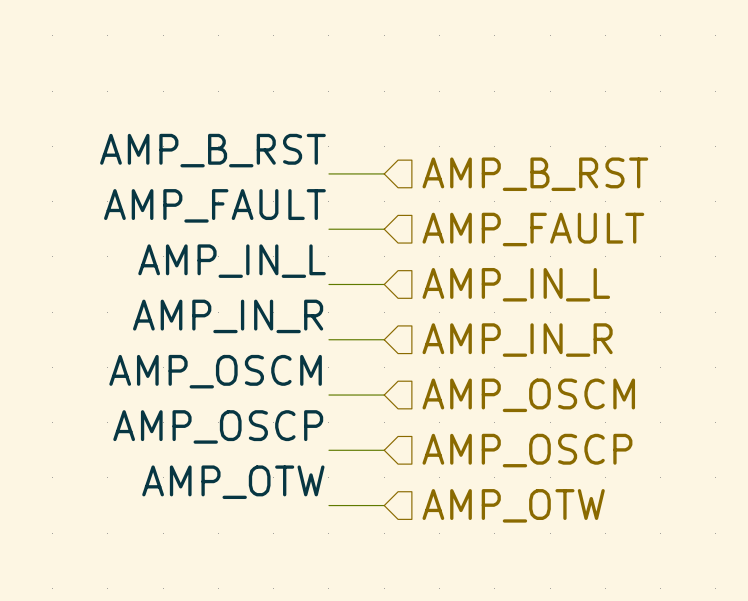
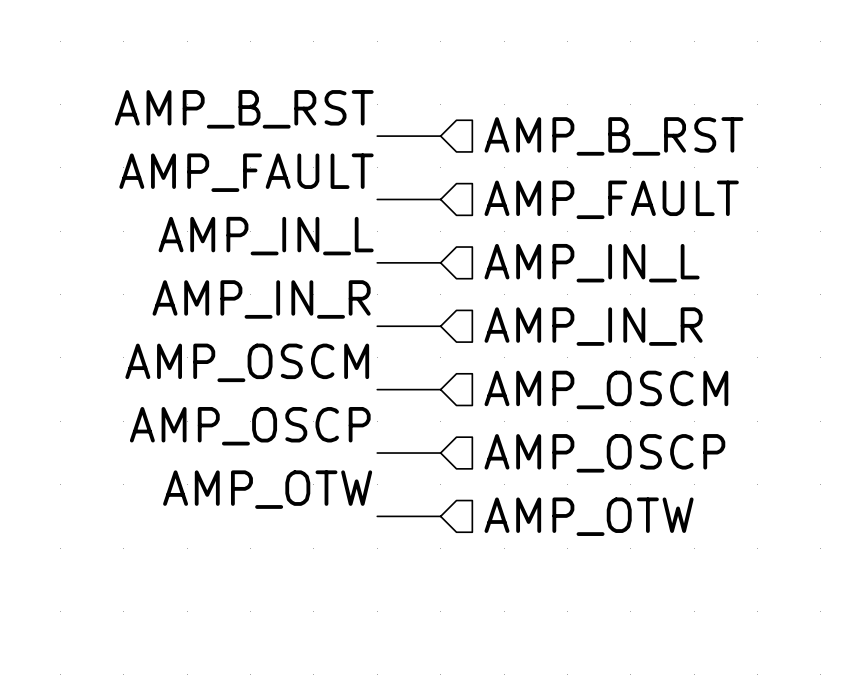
label: none -> AMP_B_RST (244, 109)
hierarchical label: none -> AMP_B_RST (613, 136)
label: AMP_B_RST (212, 150) -> AMP_FAULT (246, 172)
hierarchical label: AMP_B_RST (535, 174) -> AMP_FAULT (611, 199)
label: AMP_FAULT (214, 205) -> AMP_IN_L (266, 236)
hierarchical label: AMP_FAULT (533, 229) -> AMP_IN_L (592, 263)
label: AMP_IN_L (232, 261) -> AMP_IN_R (261, 299)
hierarchical label: AMP_IN_L (516, 284) -> AMP_IN_R (593, 326)
label: AMP_IN_R (228, 316) -> AMP_OSCM (247, 362)
hierarchical label: AMP_IN_R (517, 340) -> AMP_OSCM (606, 389)
label: AMP_OSCM (215, 371) -> AMP_OSCP (250, 426)
hierarchical label: AMP_OSCM (528, 395) -> AMP_OSCP (604, 453)
label: AMP_OSCP (218, 426) -> AMP_OTW (267, 489)
hierarchical label: AMP_OSCP (527, 450) -> AMP_OTW (589, 516)
label: AMP_OTW (233, 482) -> none
wire: (328, 505) (384, 505) -> (377, 136) (440, 136)
hierarchical label: AMP_OTW (513, 505) -> none

